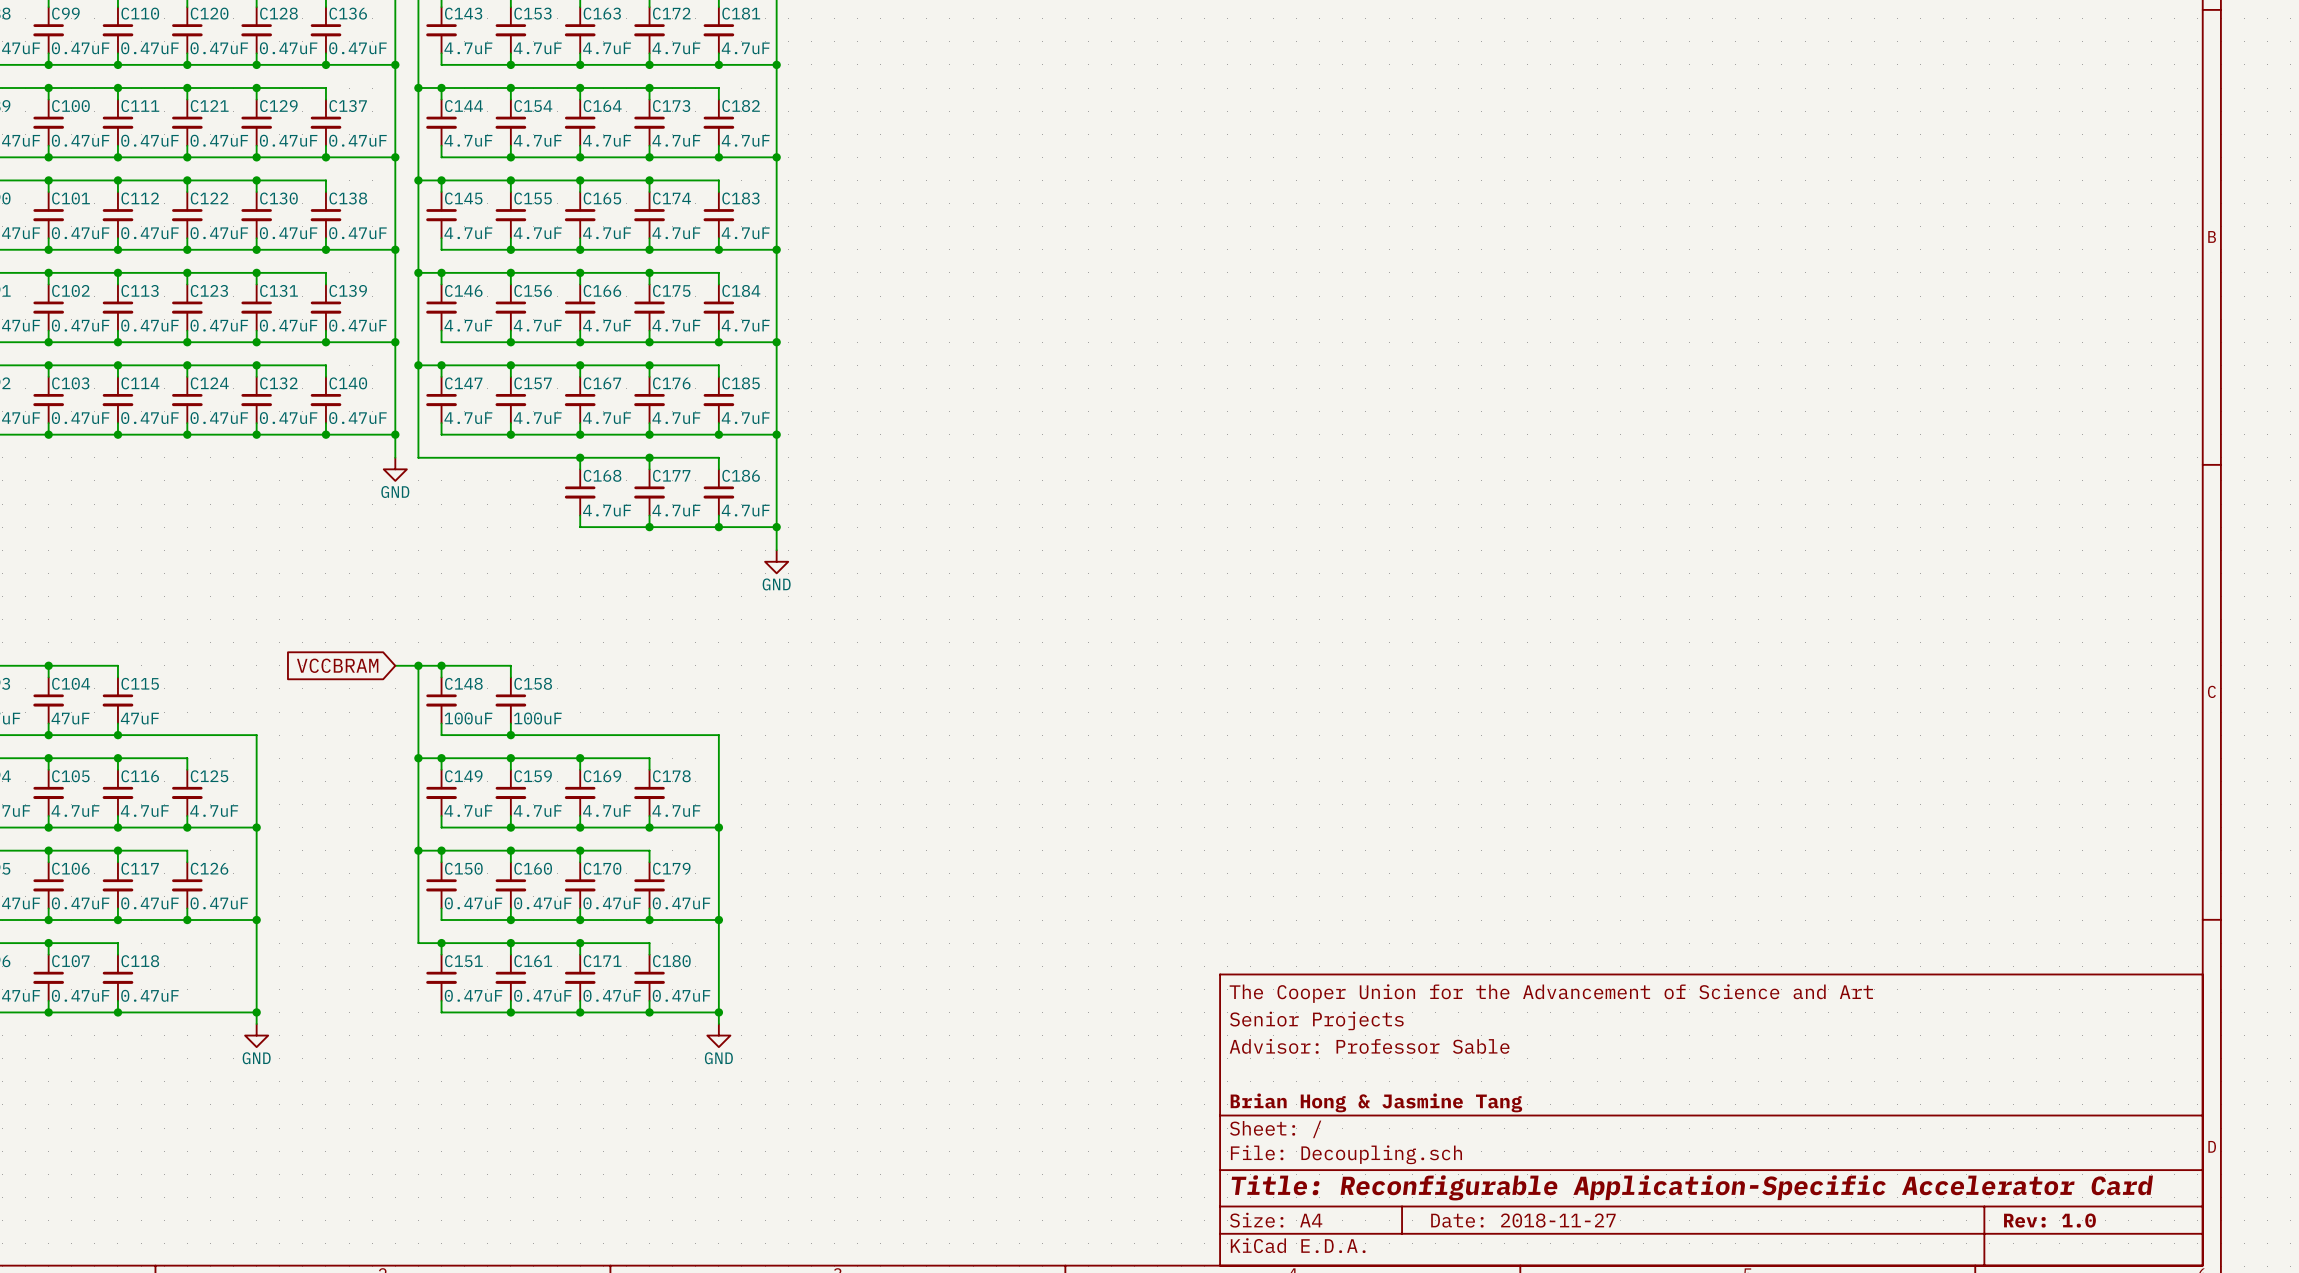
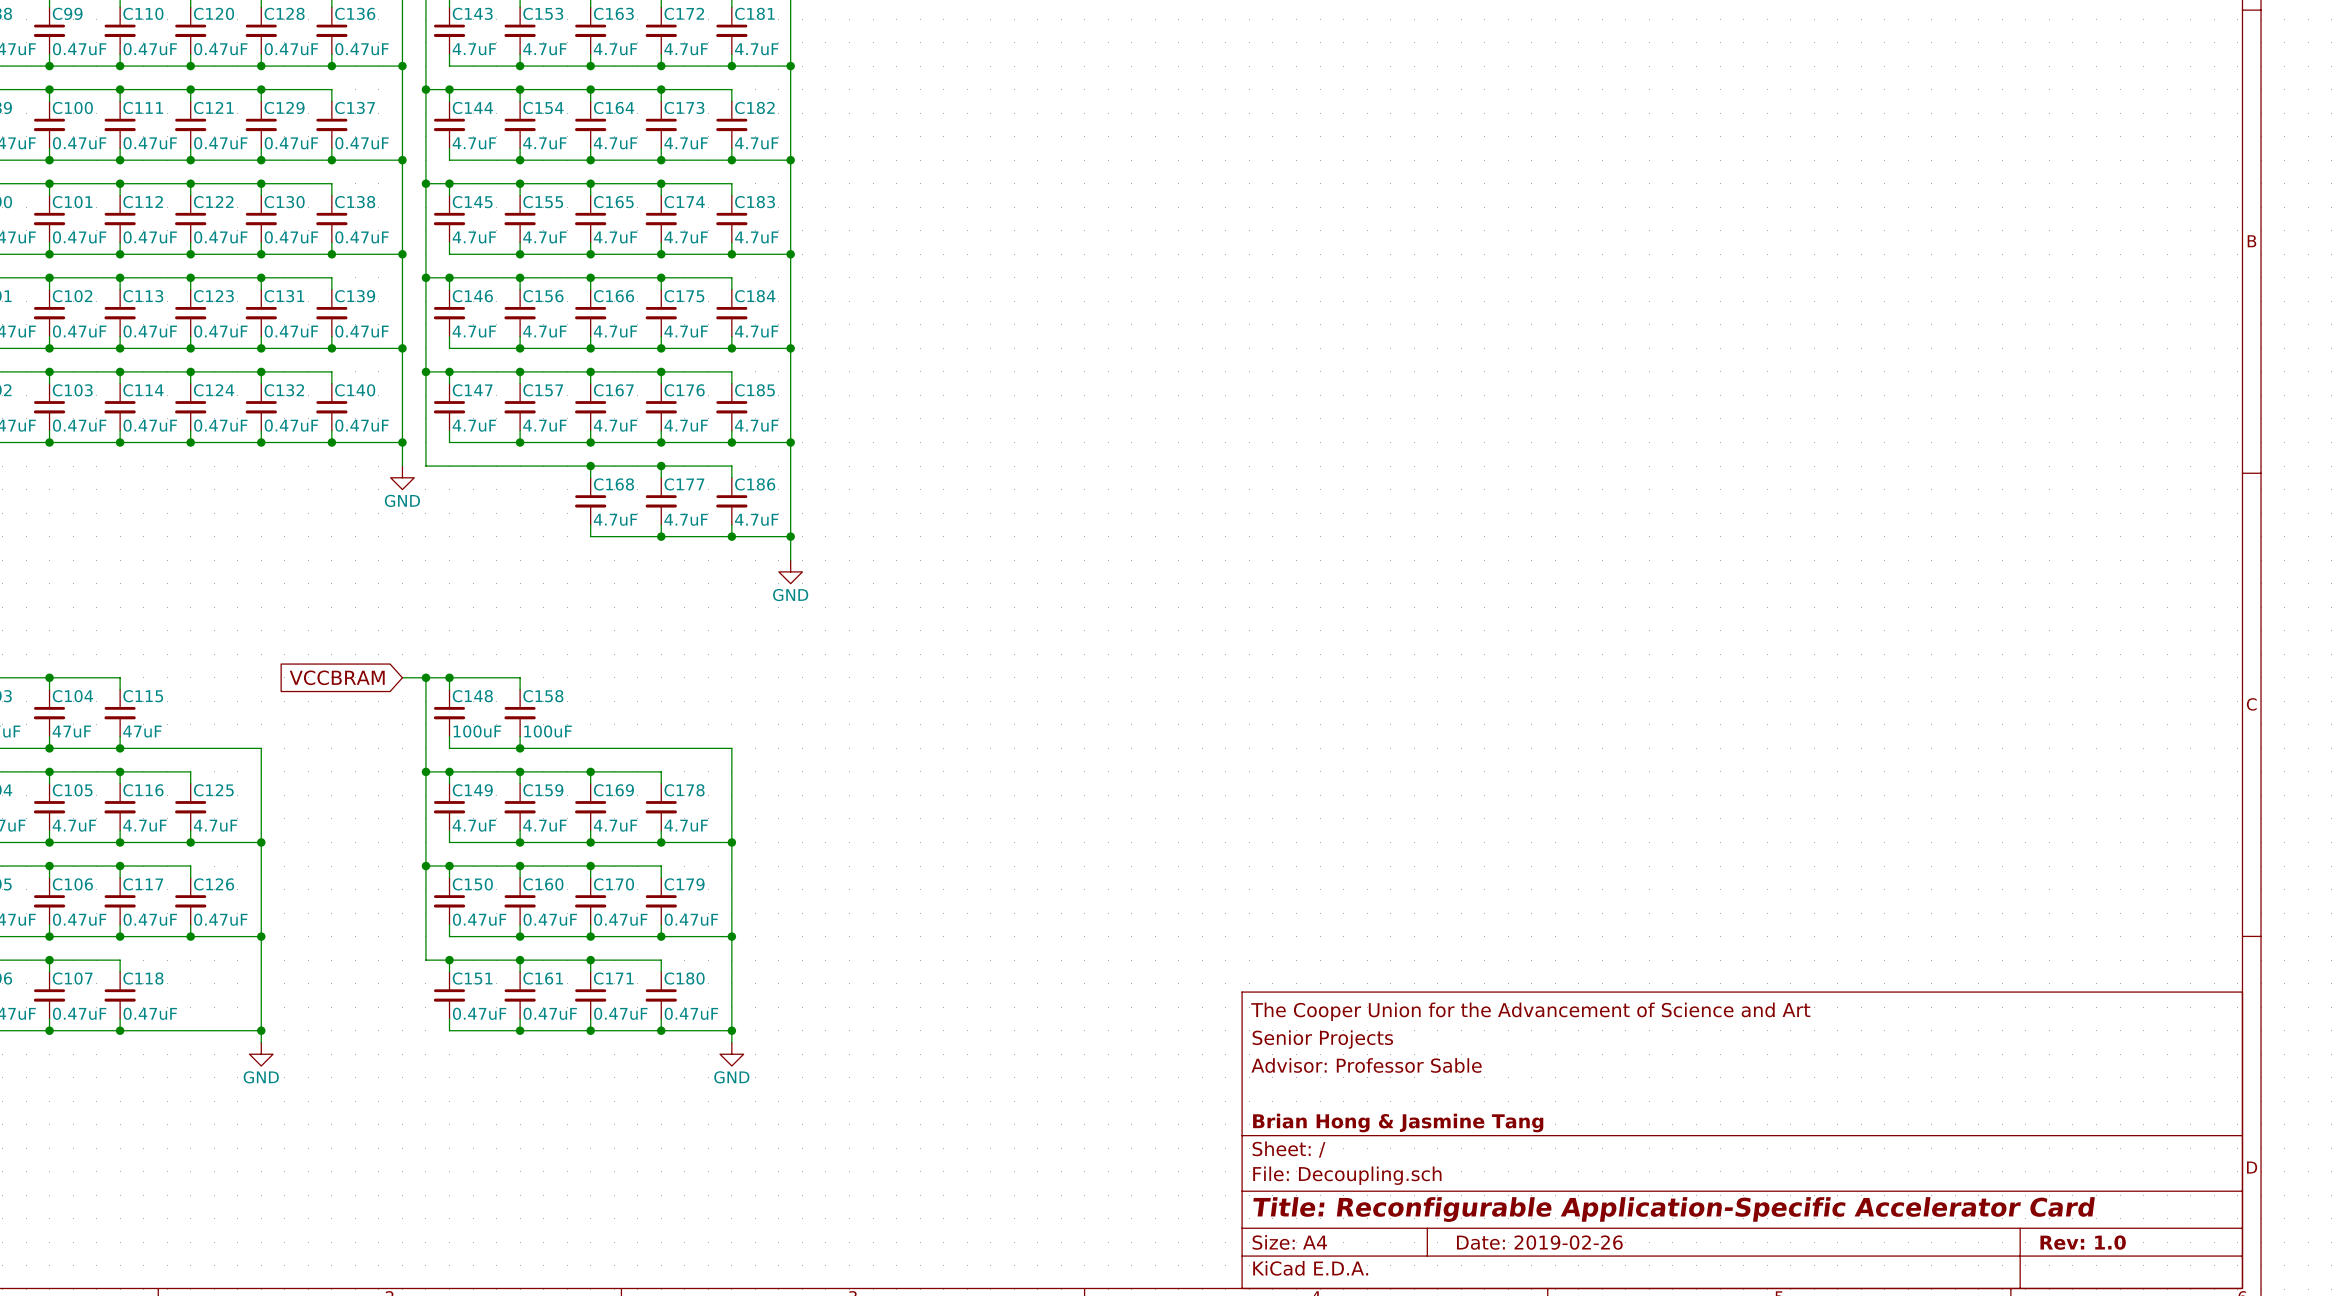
title block: Date: 2018-11-27 (1523, 1220) -> Date: 2019-02-26 (1539, 1242)

